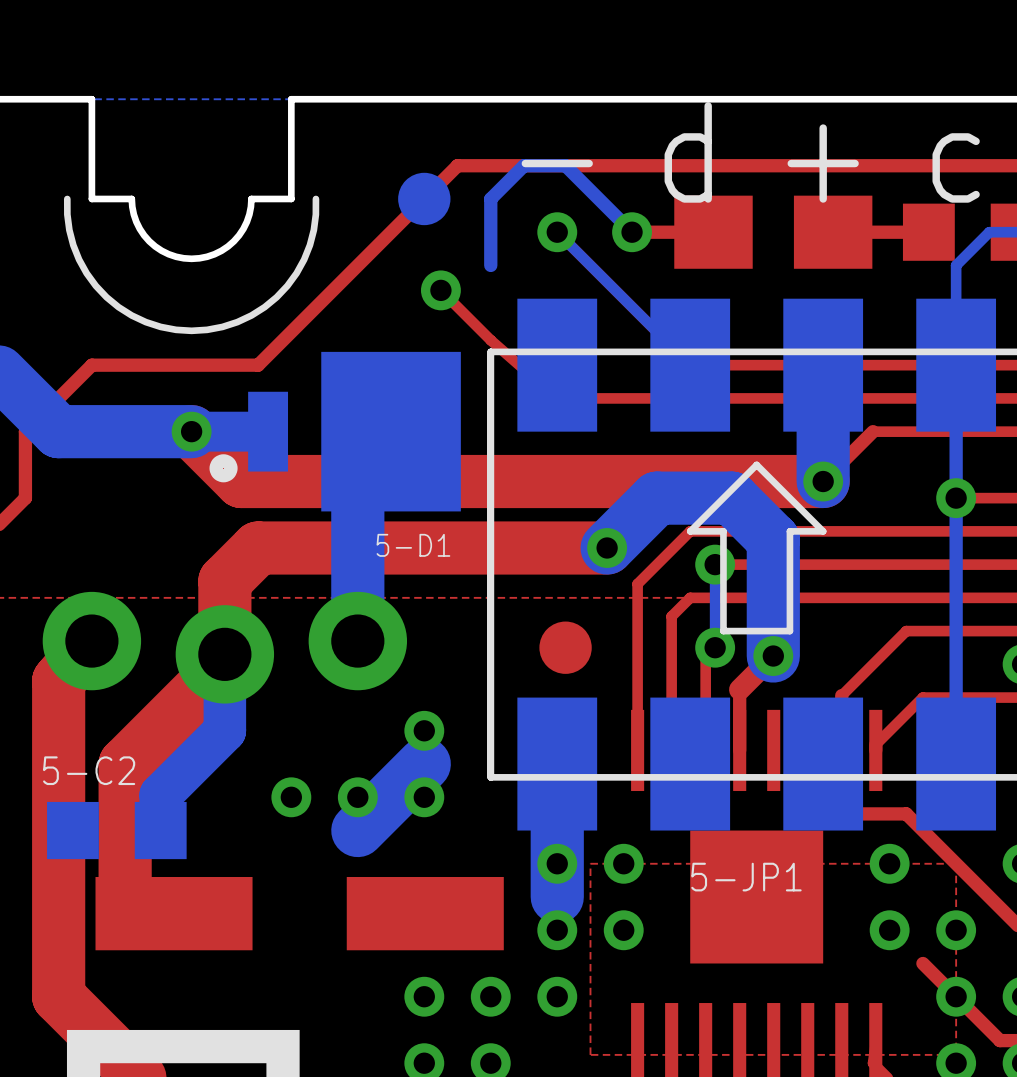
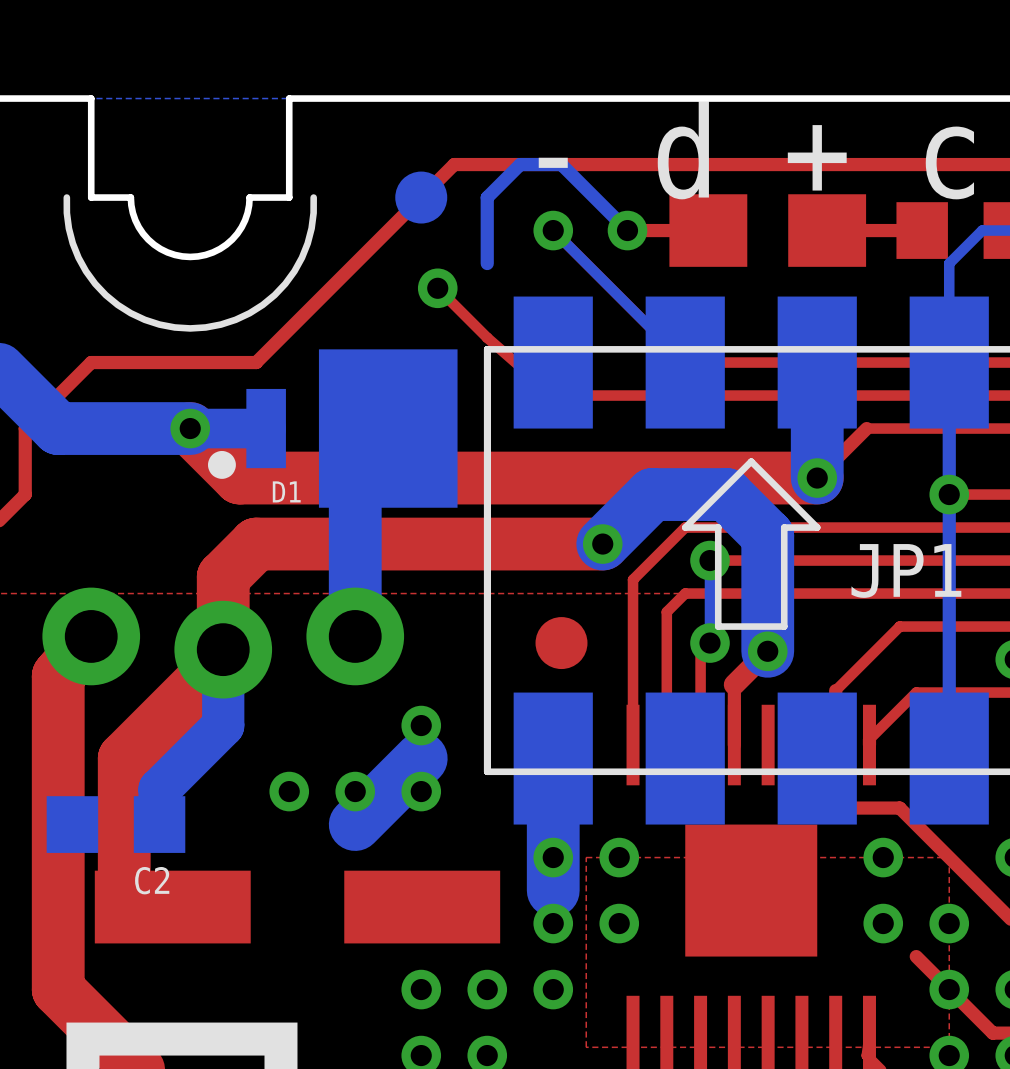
5-D1 name: 5-D1 (413, 545) -> D1 (286, 491)
5-C2 name: 5-C2 (89, 770) -> C2 (152, 880)
5-JP1 name: 5-JP1 (746, 877) -> JP1 (906, 570)

